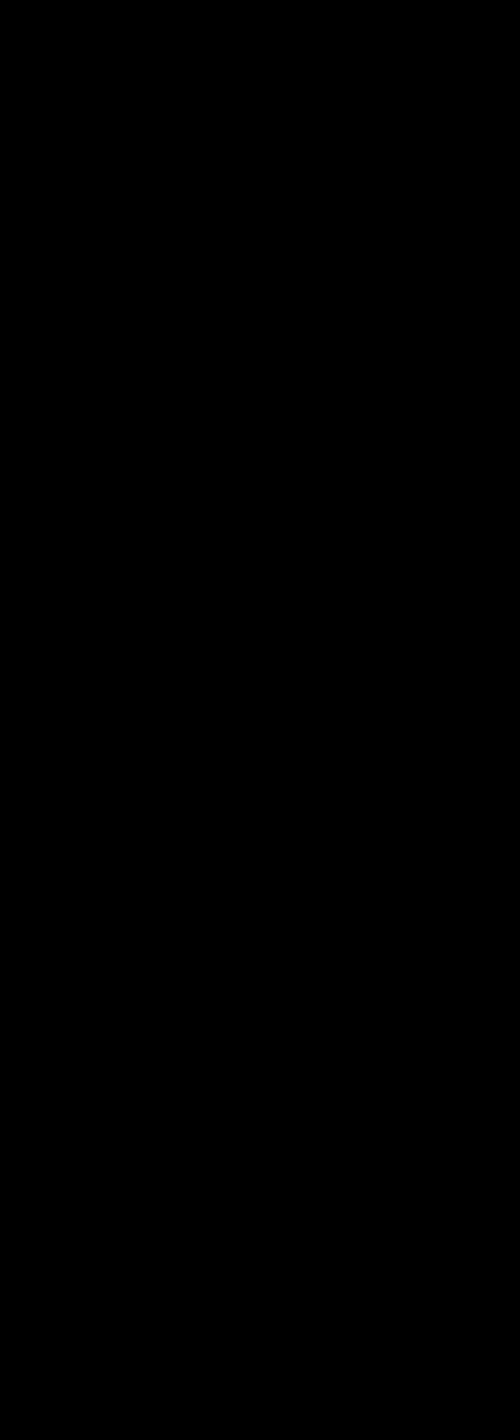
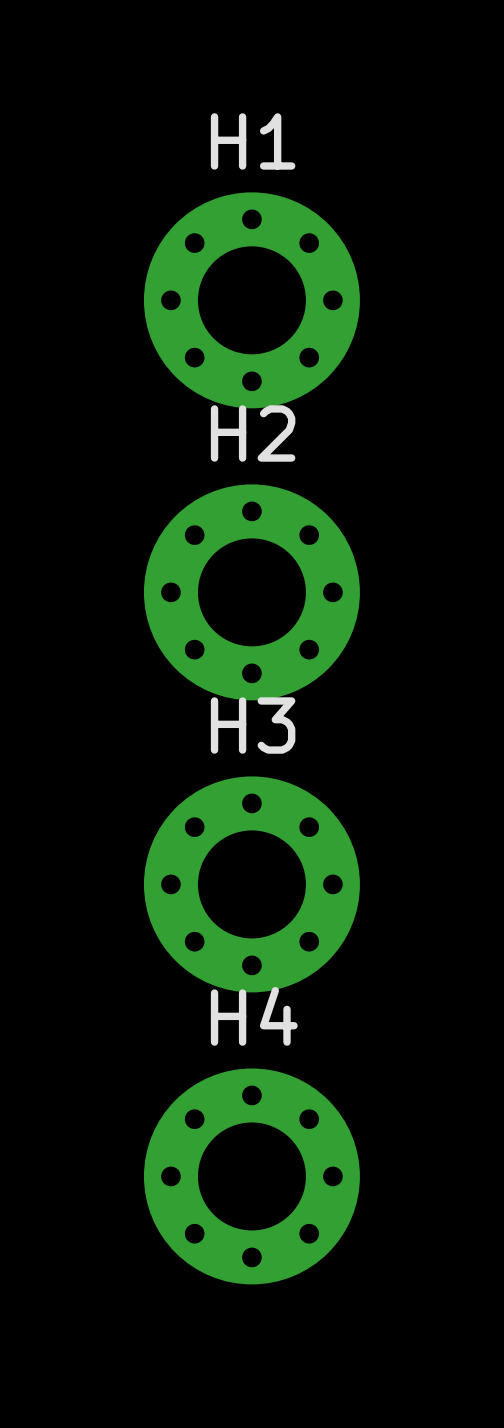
H1: none -> (251, 300)
H2: none -> (251, 592)
H3: none -> (251, 884)
H4: none -> (251, 1176)

